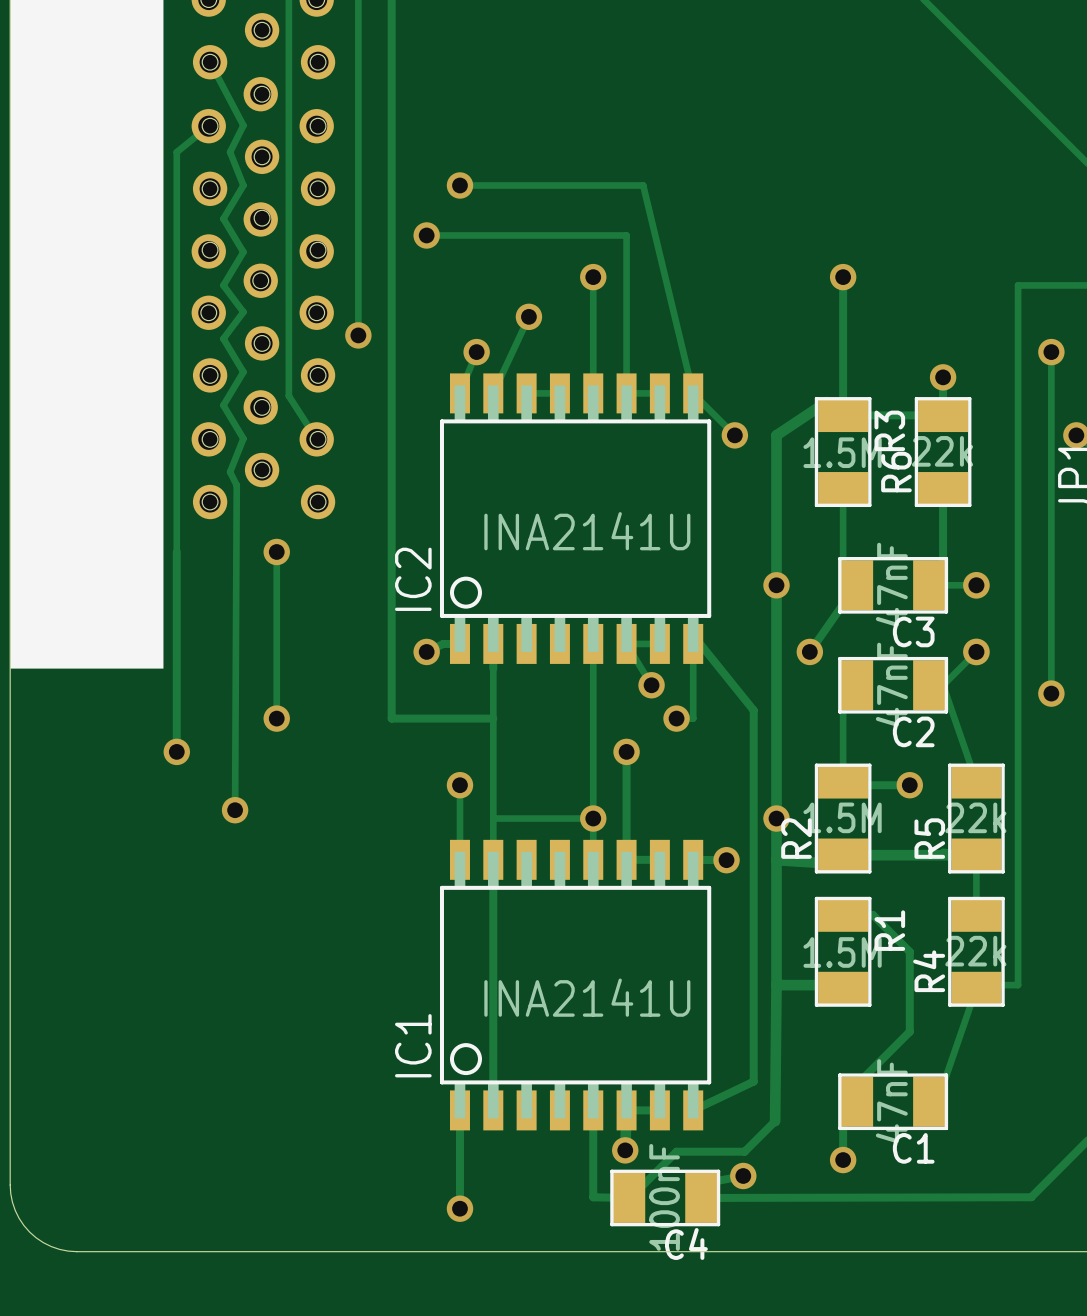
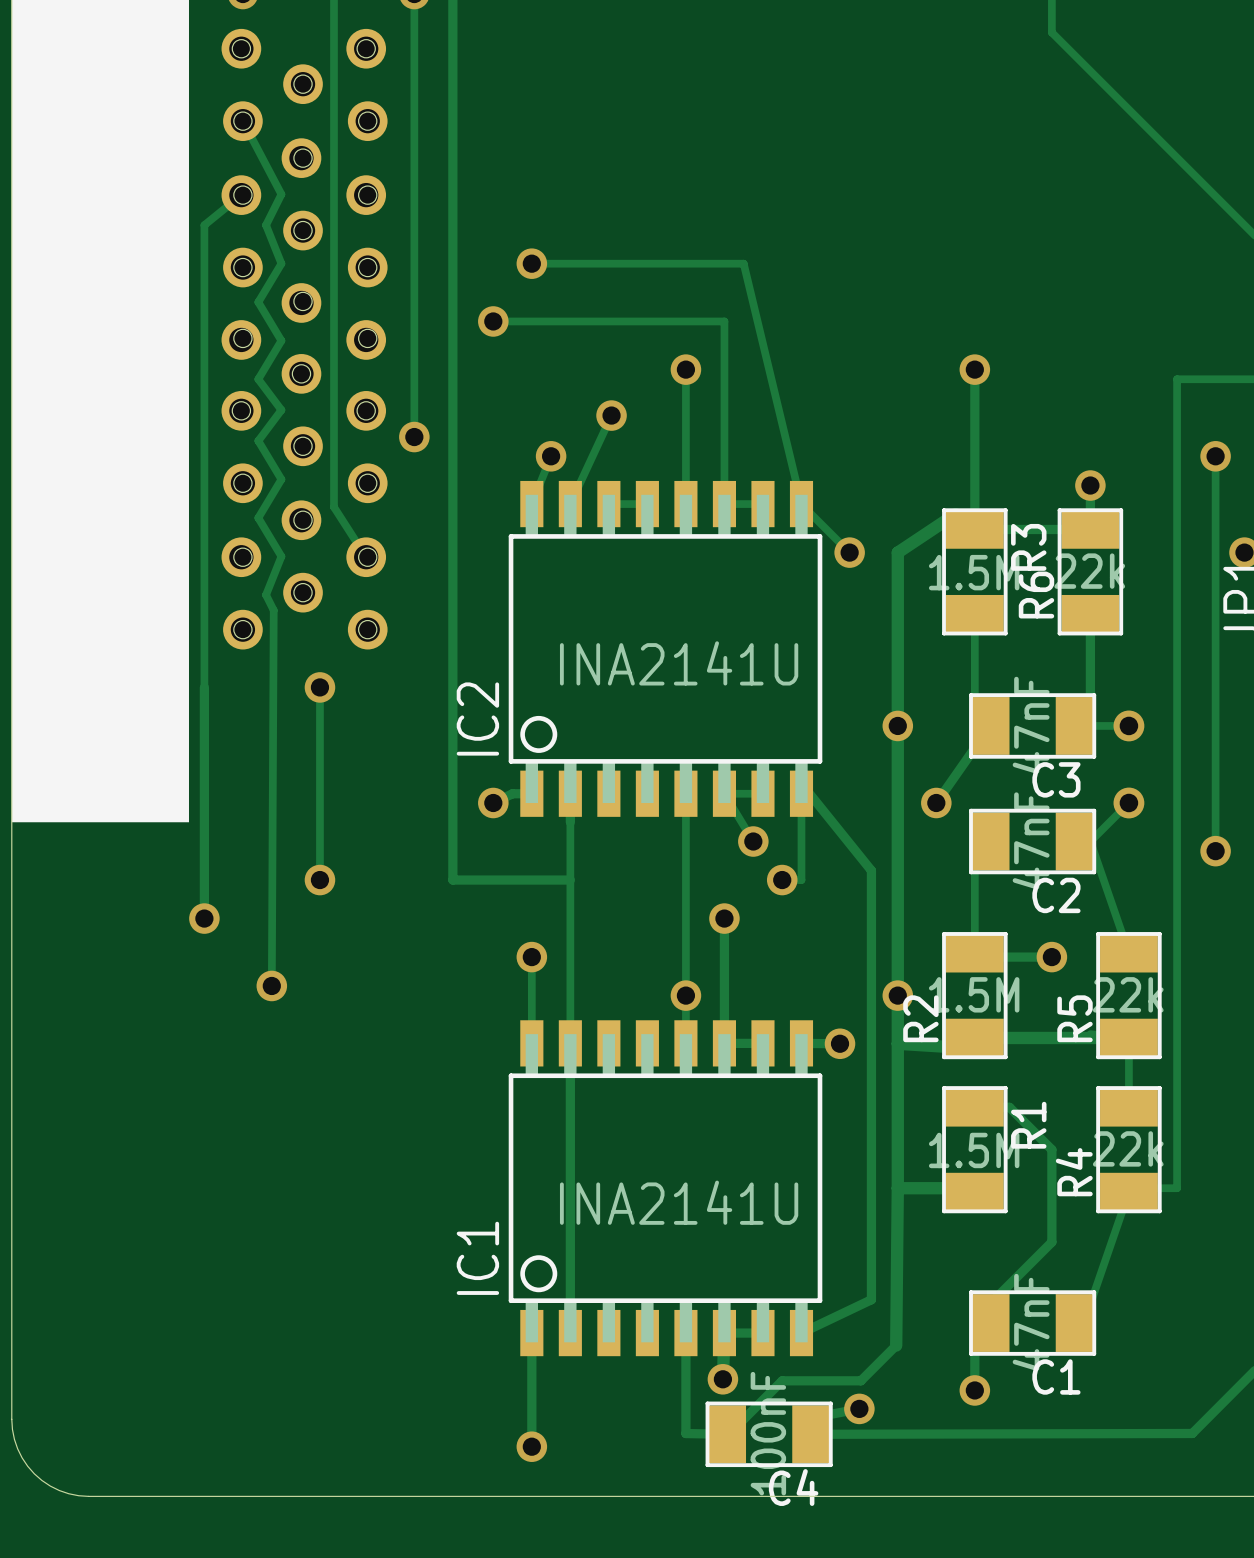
track: (493, 818) (593, 818) -> none

